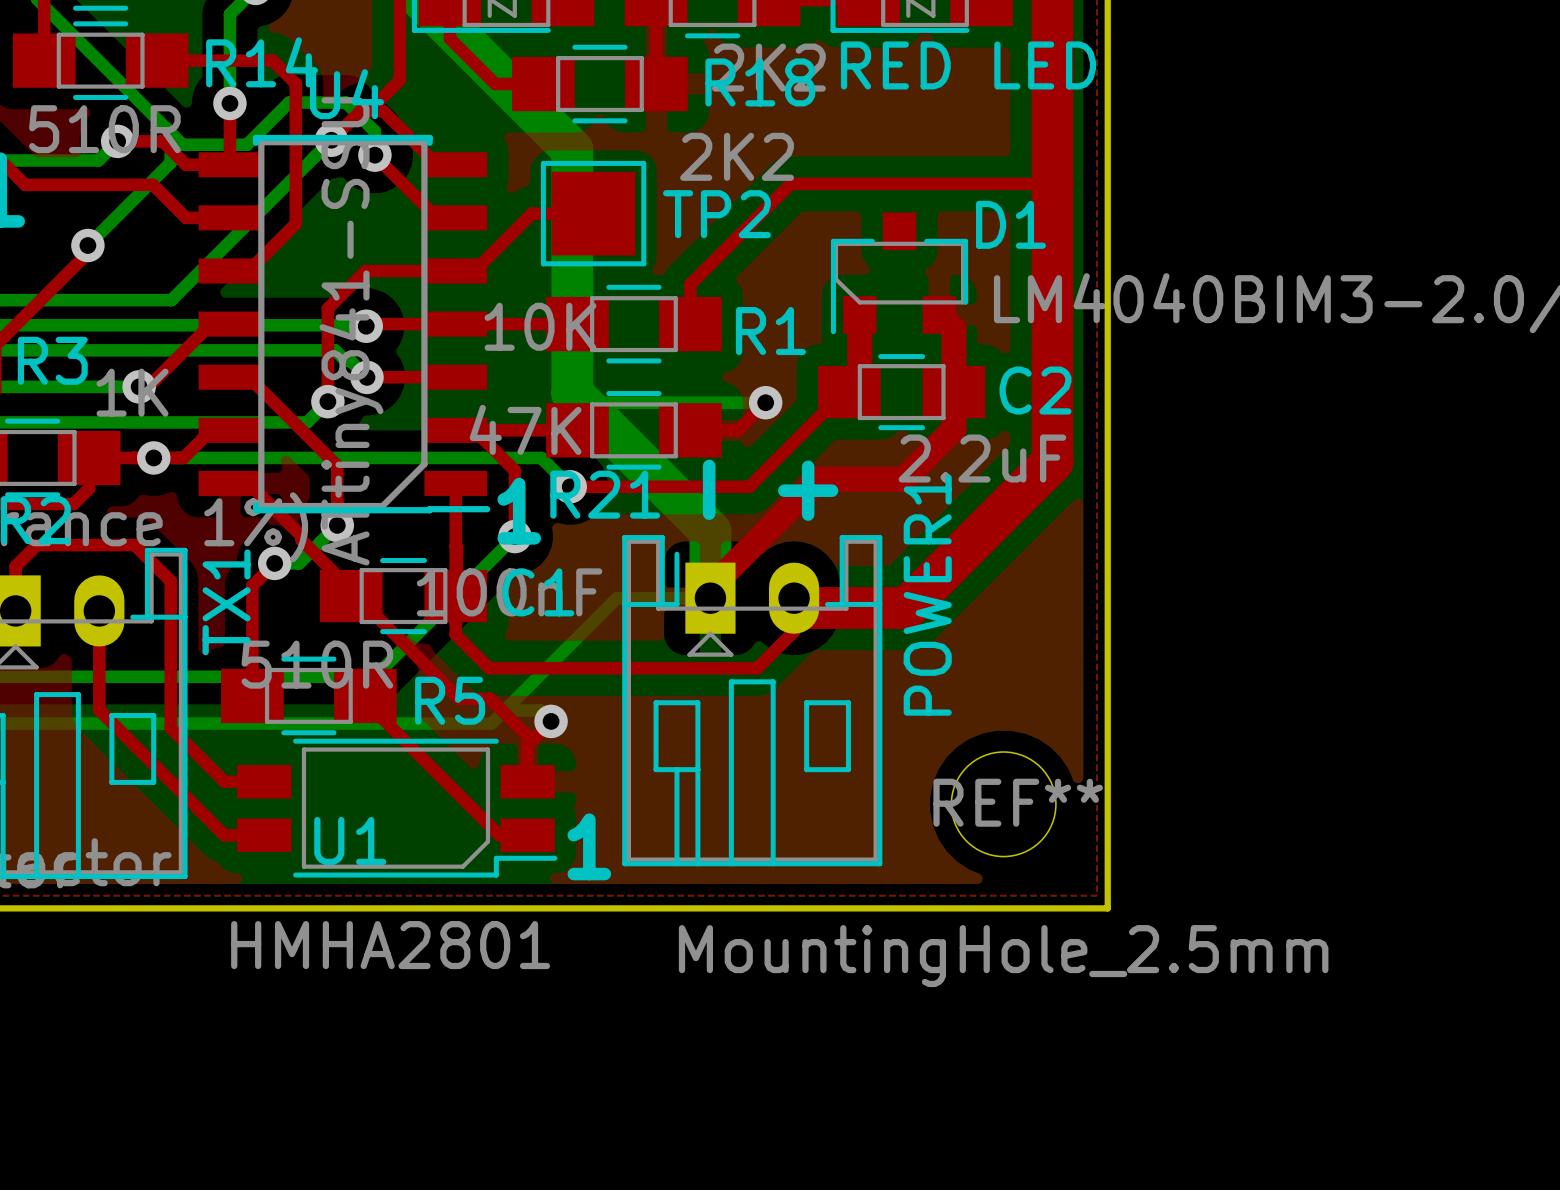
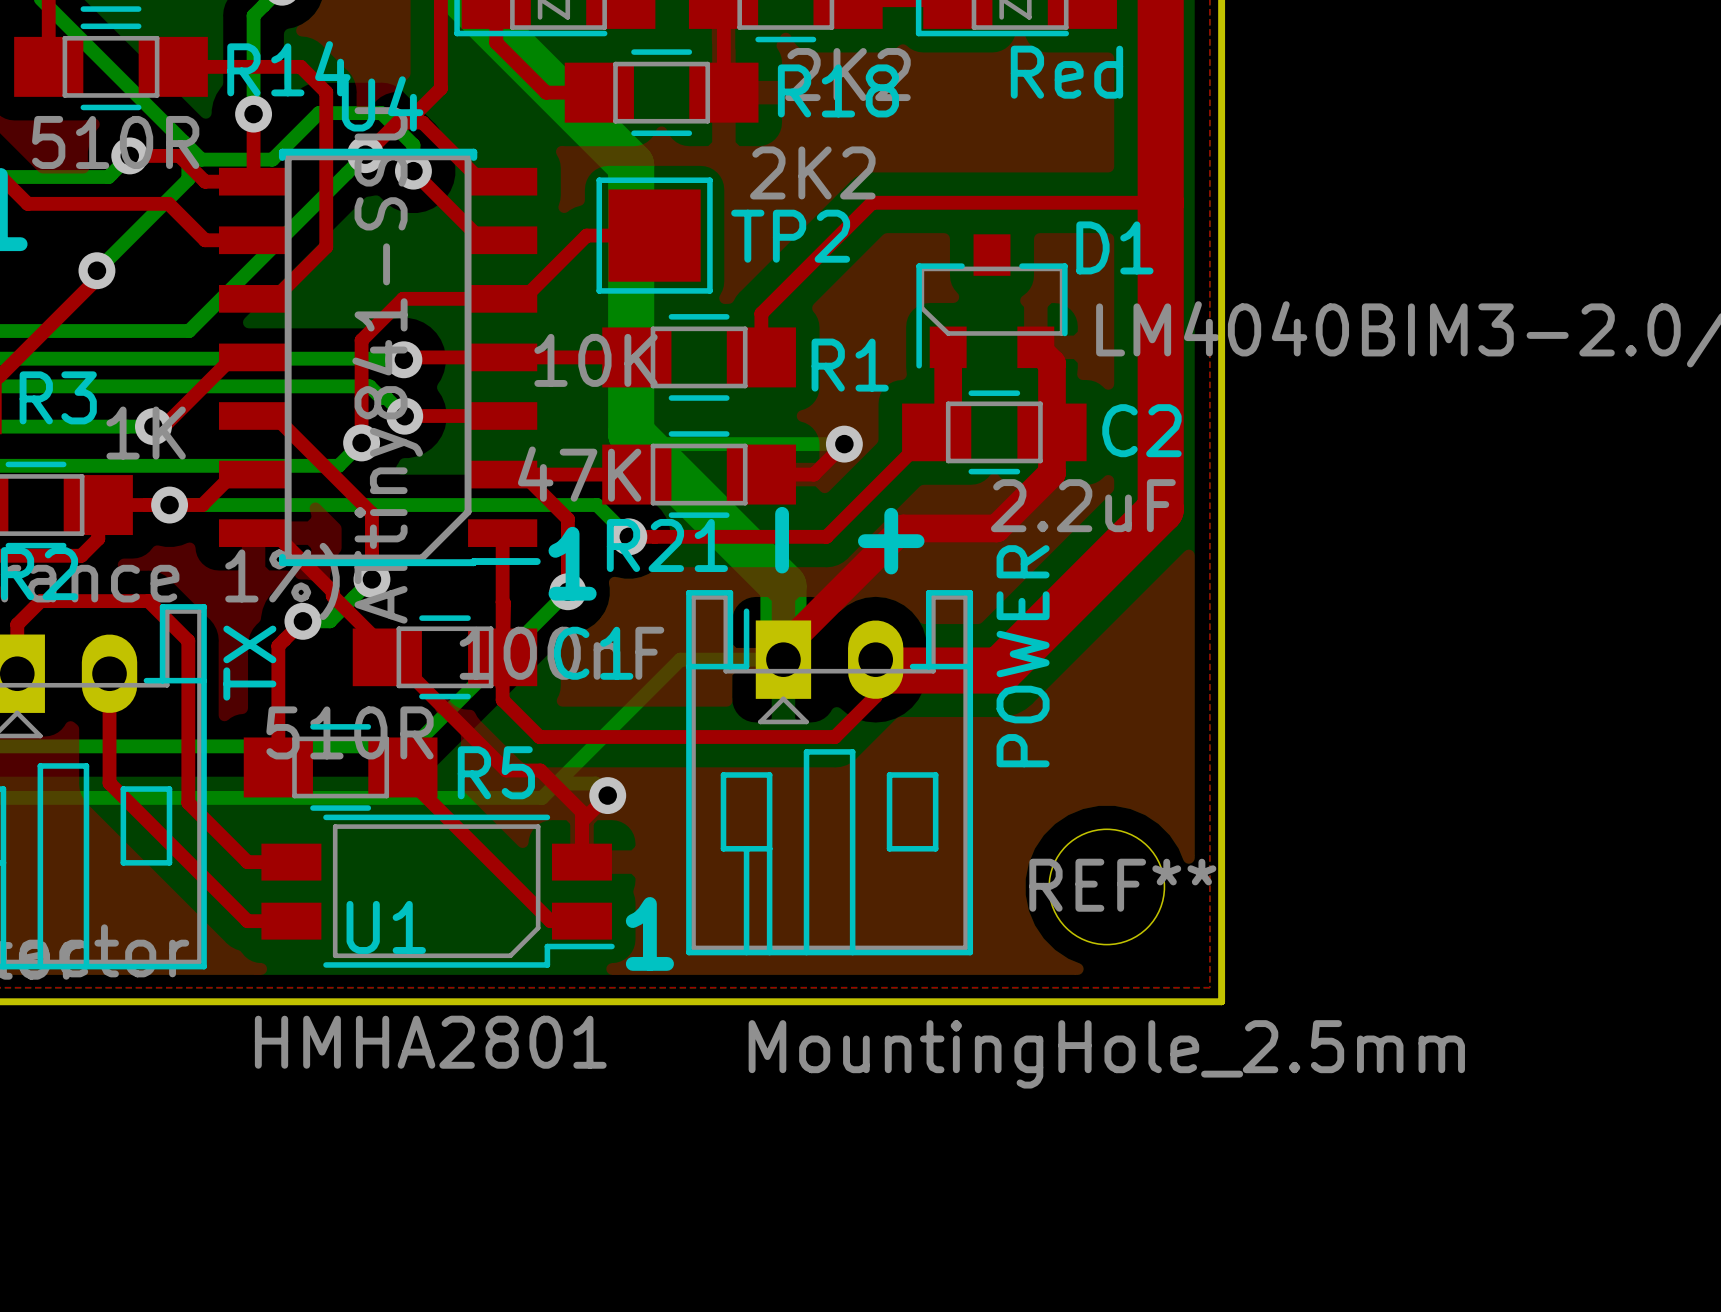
part value: RED LED (968, 65) -> Red (1066, 72)
POWER1 name: POWER1 (927, 595) -> POWER (1023, 656)
TX1 name: TX1 (226, 602) -> TX (249, 663)

